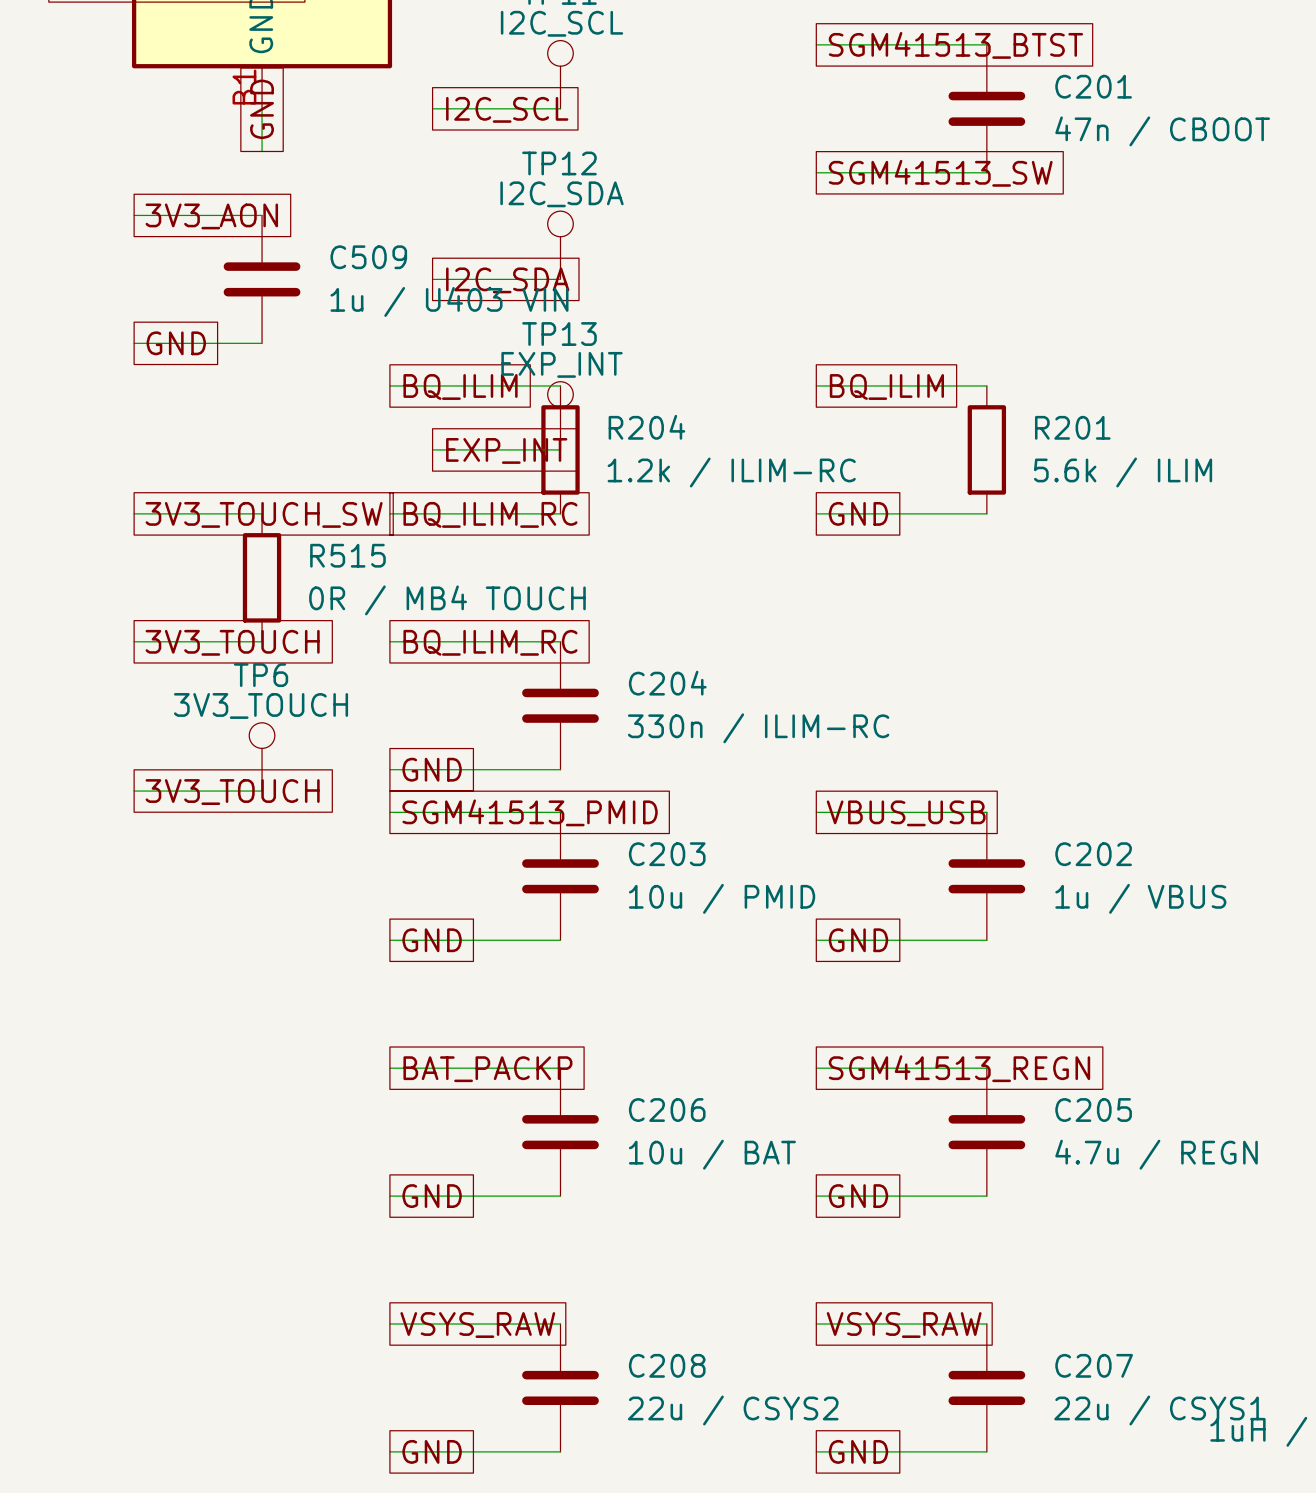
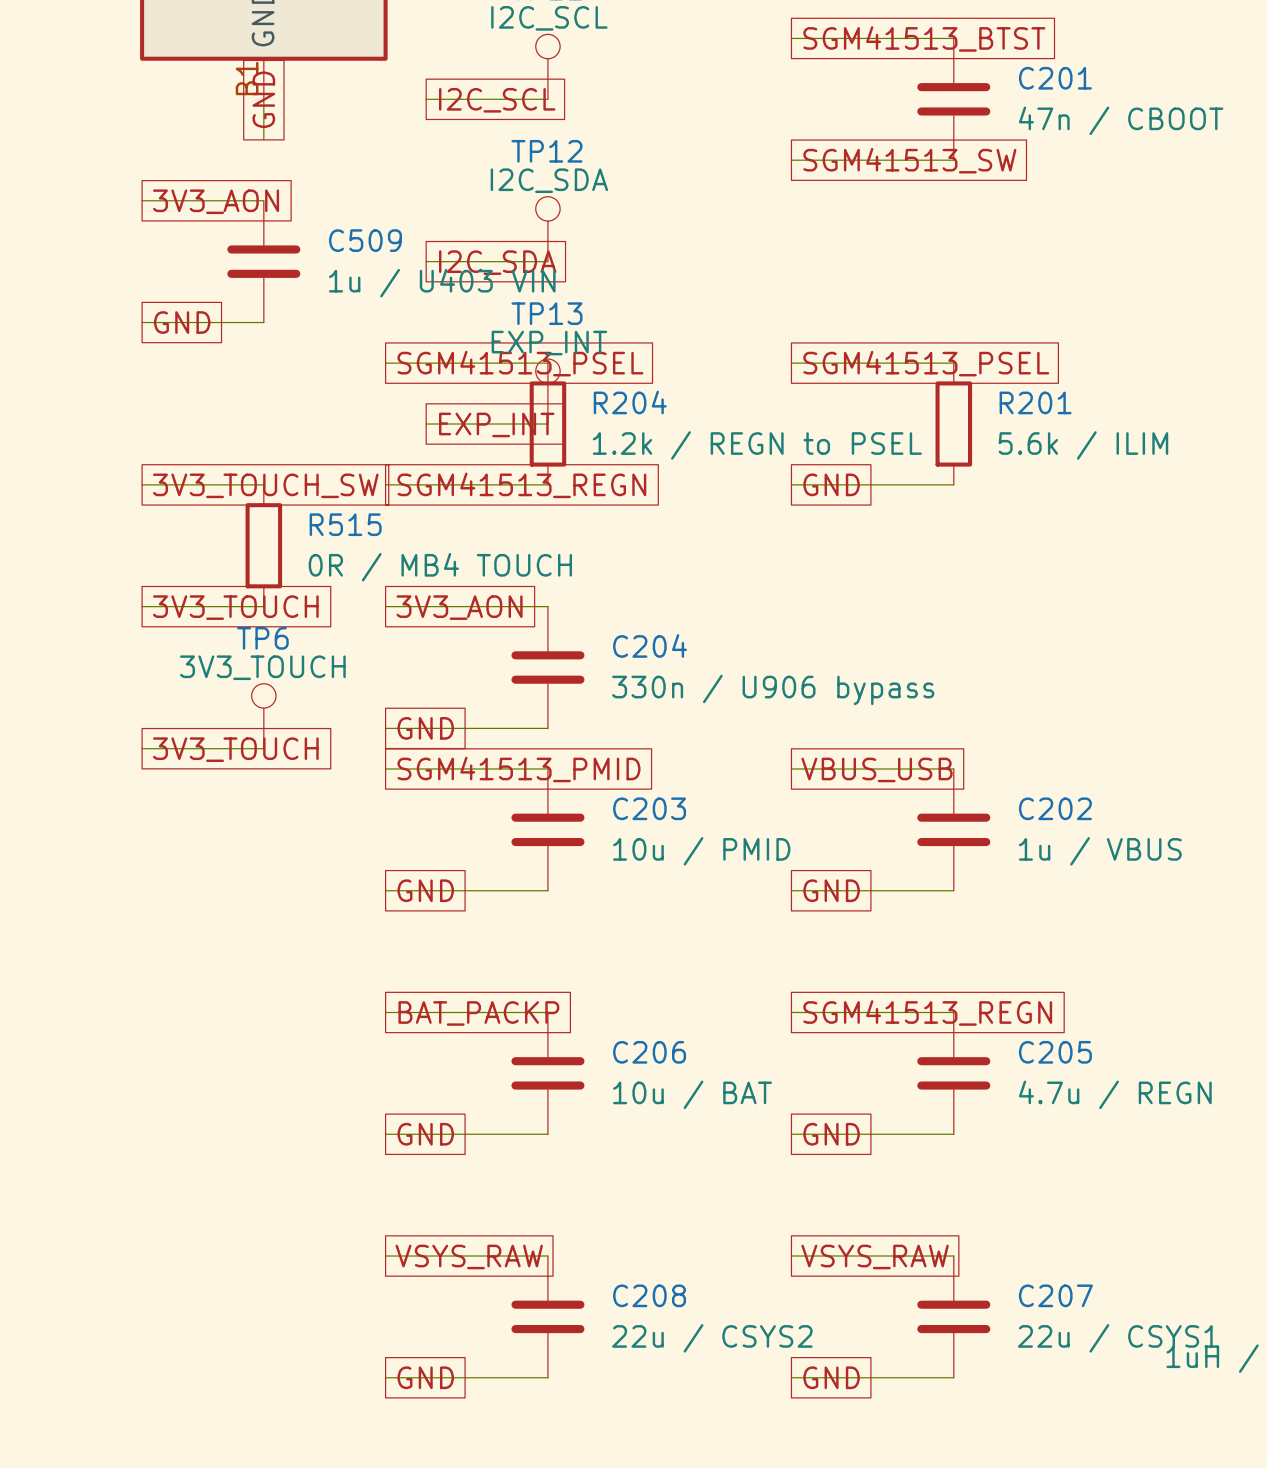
global label: BQ_ILIM (460, 386) -> SGM41513_PSEL (520, 363)
global label: BQ_ILIM (886, 386) -> SGM41513_PSEL (926, 363)
R204 value: 1.2k / ILIM-RC (731, 472) -> 1.2k / REGN to PSEL (757, 445)
global label: BQ_ILIM_RC (490, 514) -> SGM41513_REGN (521, 485)
global label: BQ_ILIM_RC (490, 642) -> 3V3_AON (459, 607)
C204 value: 330n / ILIM-RC (758, 728) -> 330n / U906 bypass (773, 689)

